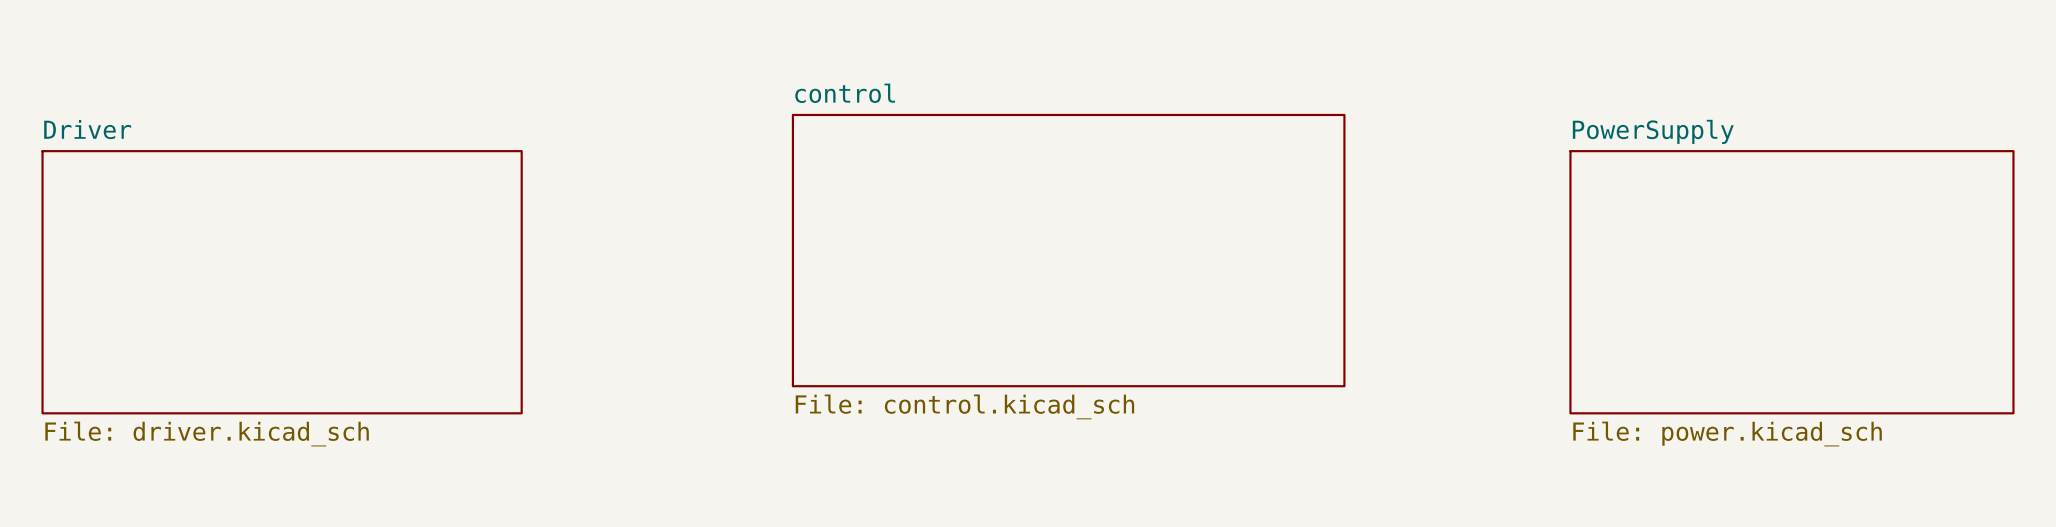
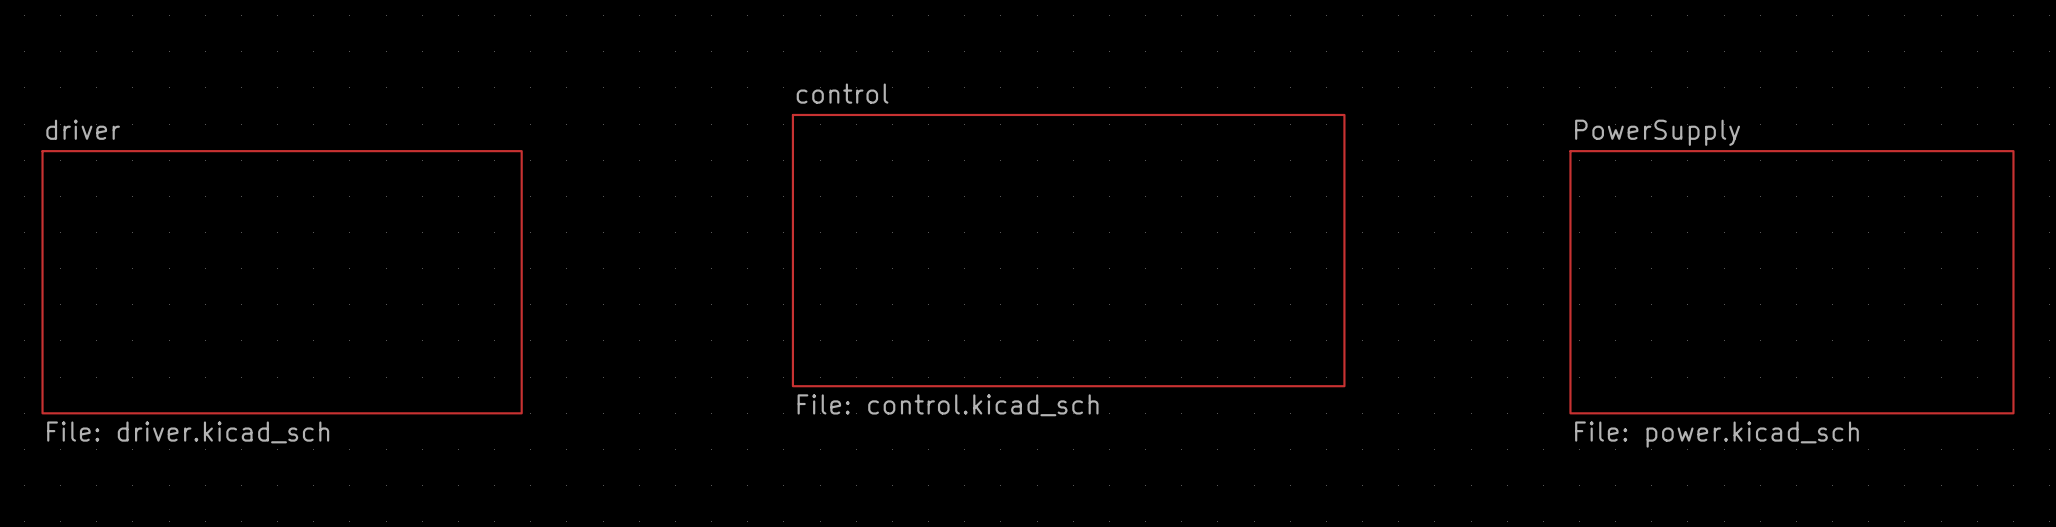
sheet Driver name: Driver (87, 129) -> driver (83, 129)

